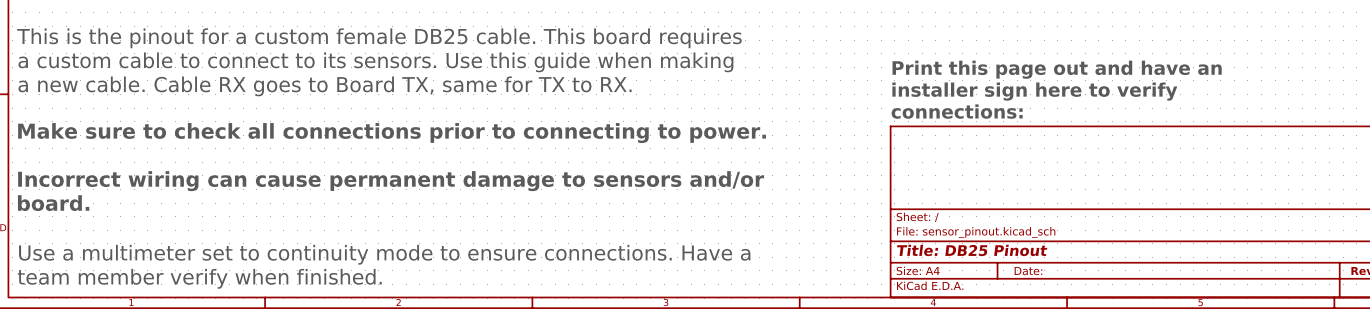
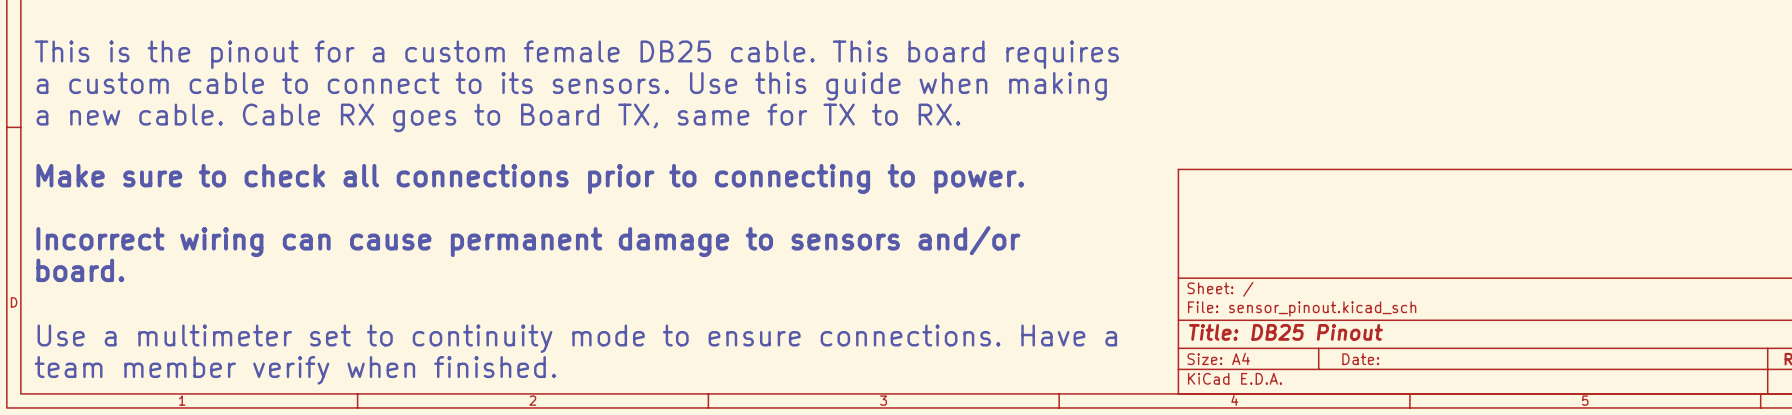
text: Print this page out and have an (1057, 69) -> none
text: installer sign here to verify (1034, 91) -> none
text: connections: (957, 111) -> none

